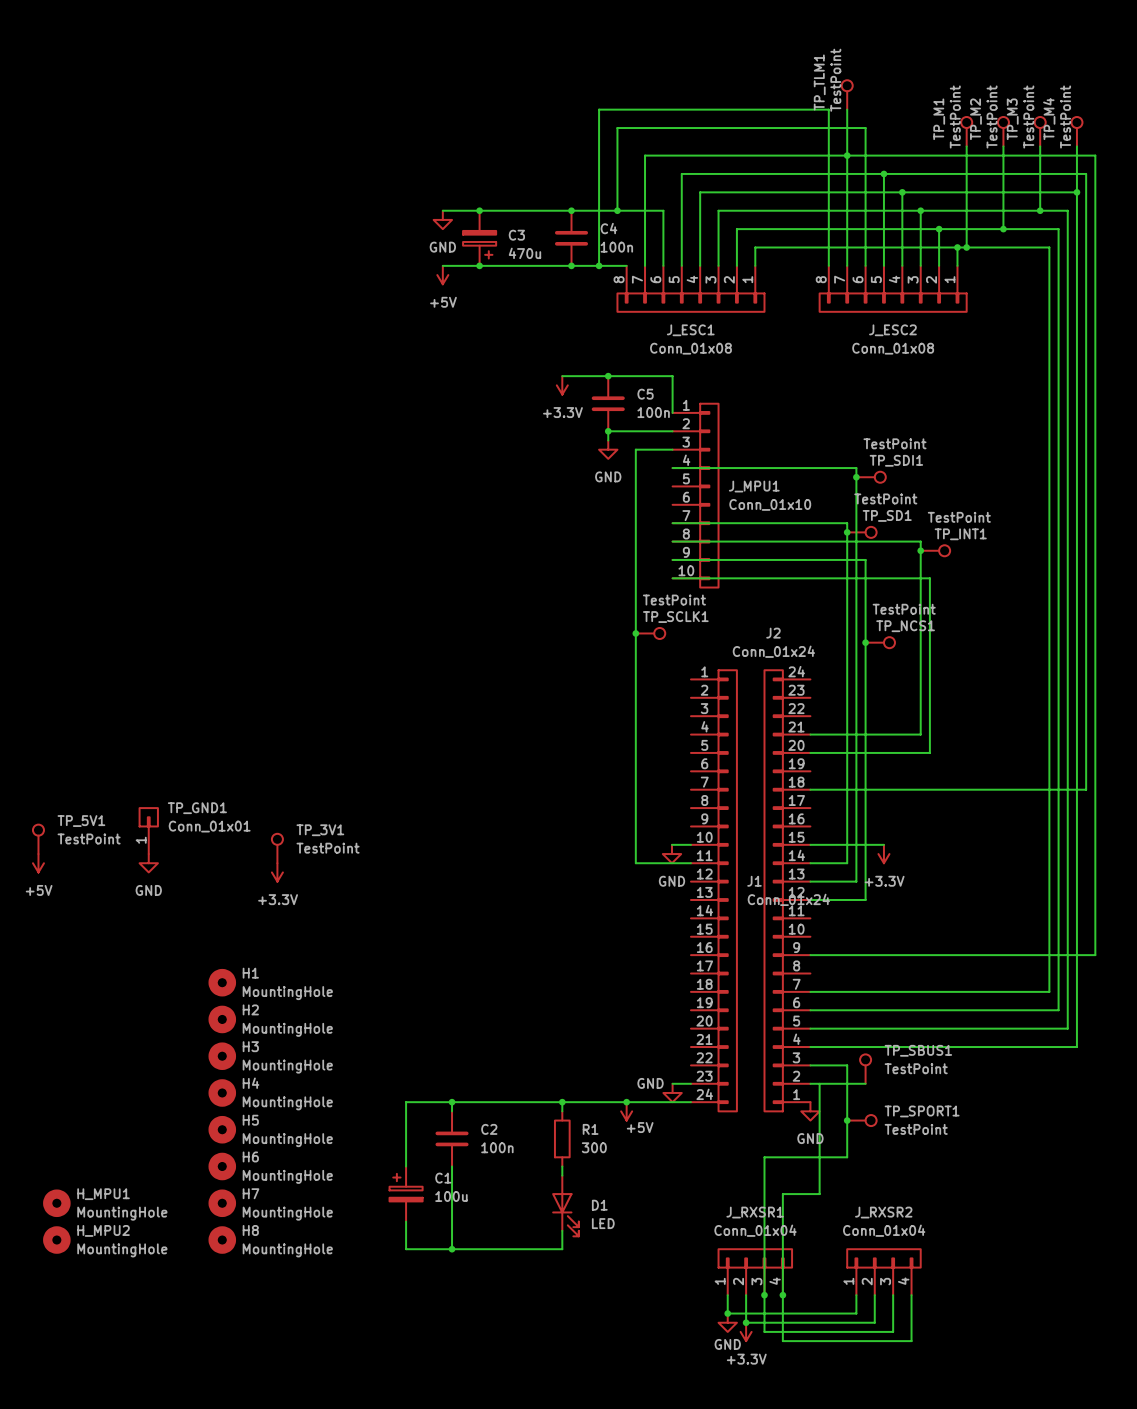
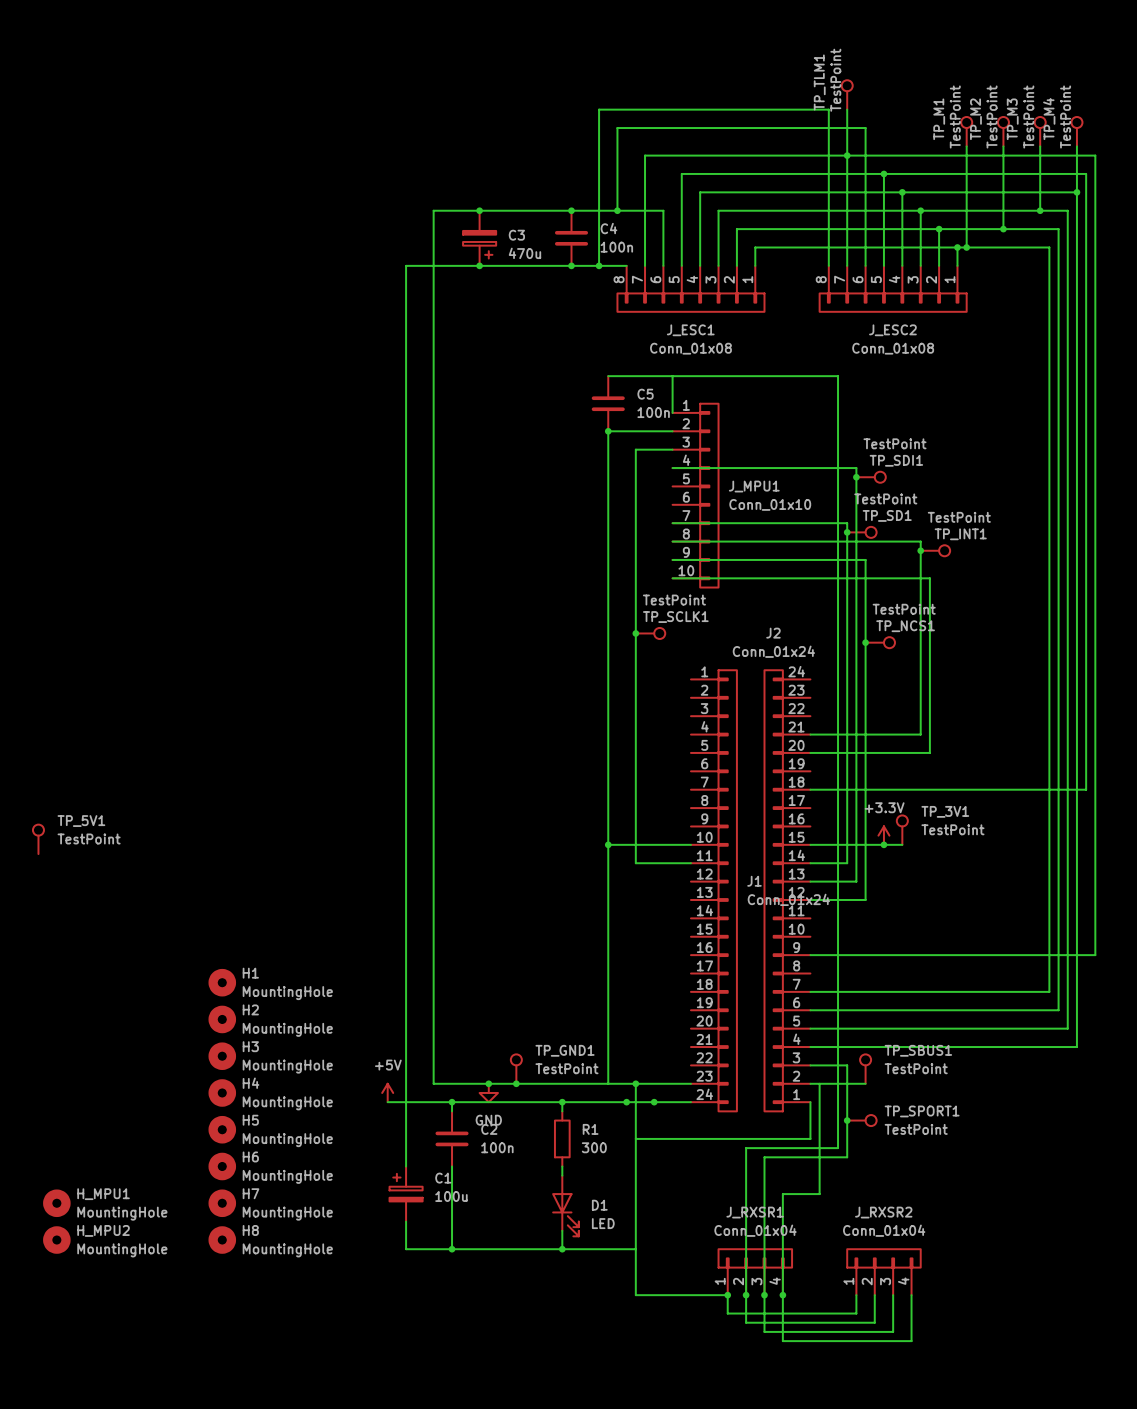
wire: none -> (442, 210) (433, 210) (433, 1083) (672, 1083)
power symbol: GND (442, 219) -> none
wire: none -> (442, 265) (406, 265) (406, 1102) (387, 1102)
power symbol: +5V (442, 275) -> none
wire: (562, 376) (608, 376) -> none
junction: (608, 376) -> none
wire: none -> (672, 376) (838, 376) (838, 1148) (746, 1148) (746, 1295)
power symbol: +3.3V (562, 385) -> none
wire: none -> (608, 440) (608, 1083)
power symbol: GND (608, 449) -> none
TP_GND1 symbol: [138, 807, 159, 855] -> [510, 1054, 522, 1084]
TP_GND1 value: Conn_01x01 (209, 826) -> TestPoint (566, 1068)
wire: none -> (608, 844) (671, 844)
junction: none -> (608, 844)
wire: none -> (883, 844) (902, 844)
junction: none -> (883, 844)
TP_3V1 position: (277, 848) -> (902, 830)
power symbol: GND (671, 854) -> none
power symbol rotation: 0° (883, 854) -> 180° (883, 835)
power symbol position: +3.3V (883, 854) -> +3.3V (883, 835)
power symbol: +5V (38, 863) -> none
power symbol: GND (148, 863) -> none
power symbol: +3.3V (277, 872) -> none
junction: none -> (488, 1083)
junction: none -> (516, 1083)
wire: none -> (635, 1083) (635, 1295) (727, 1295)
junction: none -> (635, 1083)
power symbol: none -> +5V (387, 1092)
power symbol: none -> GND (488, 1092)
power symbol: GND (672, 1092) -> none
junction: none -> (654, 1102)
wire: none -> (810, 1102) (810, 1138) (635, 1138)
power symbol: +5V (626, 1111) -> none
power symbol: GND (810, 1111) -> none
wire: none -> (562, 1249) (635, 1249)
junction: none -> (562, 1249)
junction: none -> (727, 1295)
junction: none -> (746, 1295)
junction: (727, 1313) -> none
power symbol: GND (727, 1322) -> none
junction: (746, 1322) -> none
power symbol: +3.3V (746, 1331) -> none

